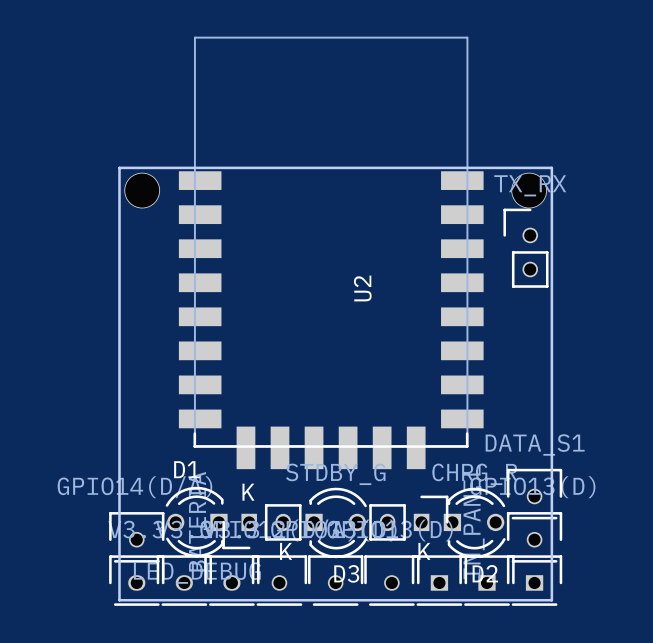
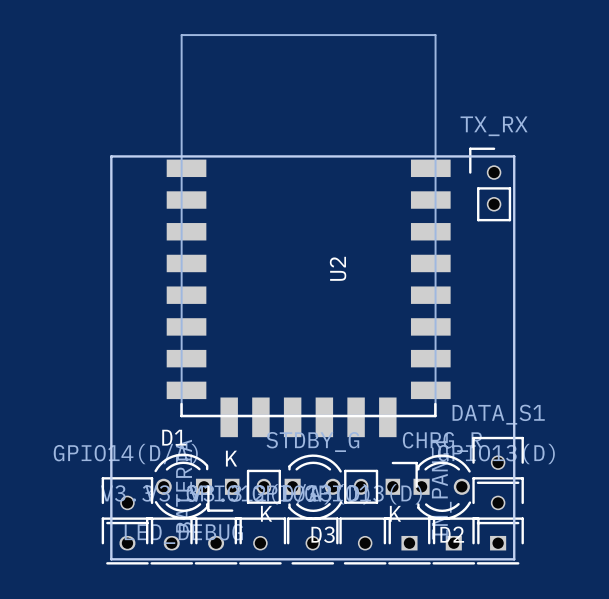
part value: none -> TX_RX (494, 126)
part footprint: [511, 172, 548, 209] -> [469, 147, 512, 222]
part: (142, 190) -> none
part: TX_RX (525, 248) -> none

